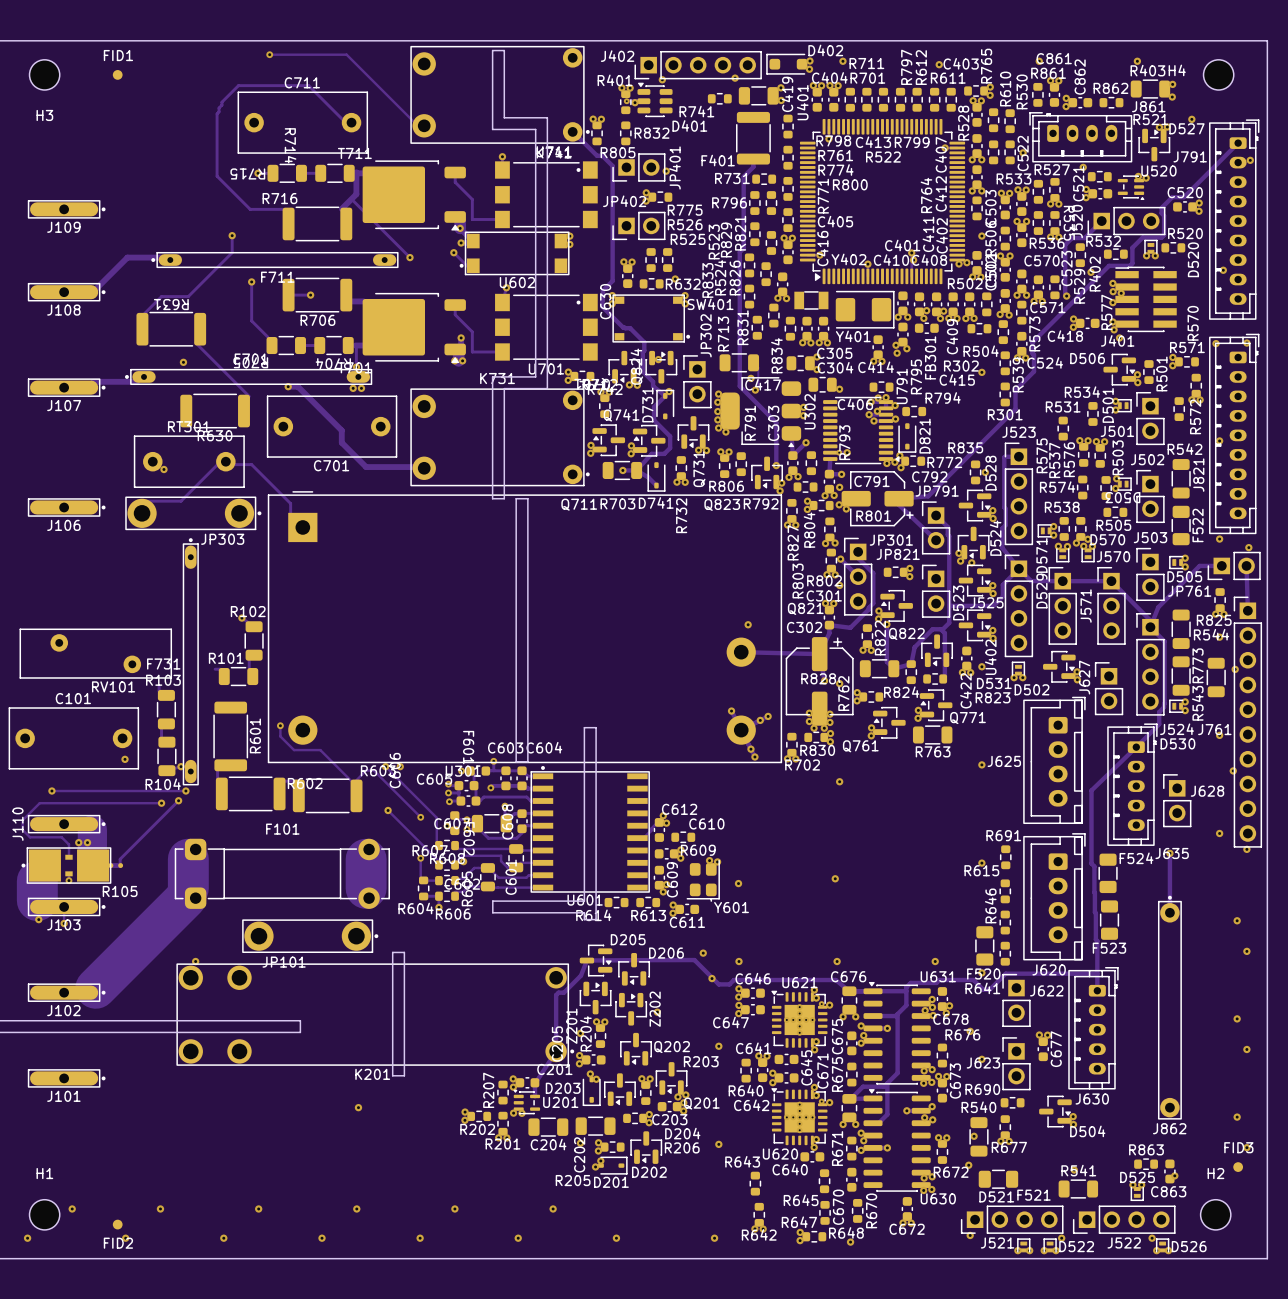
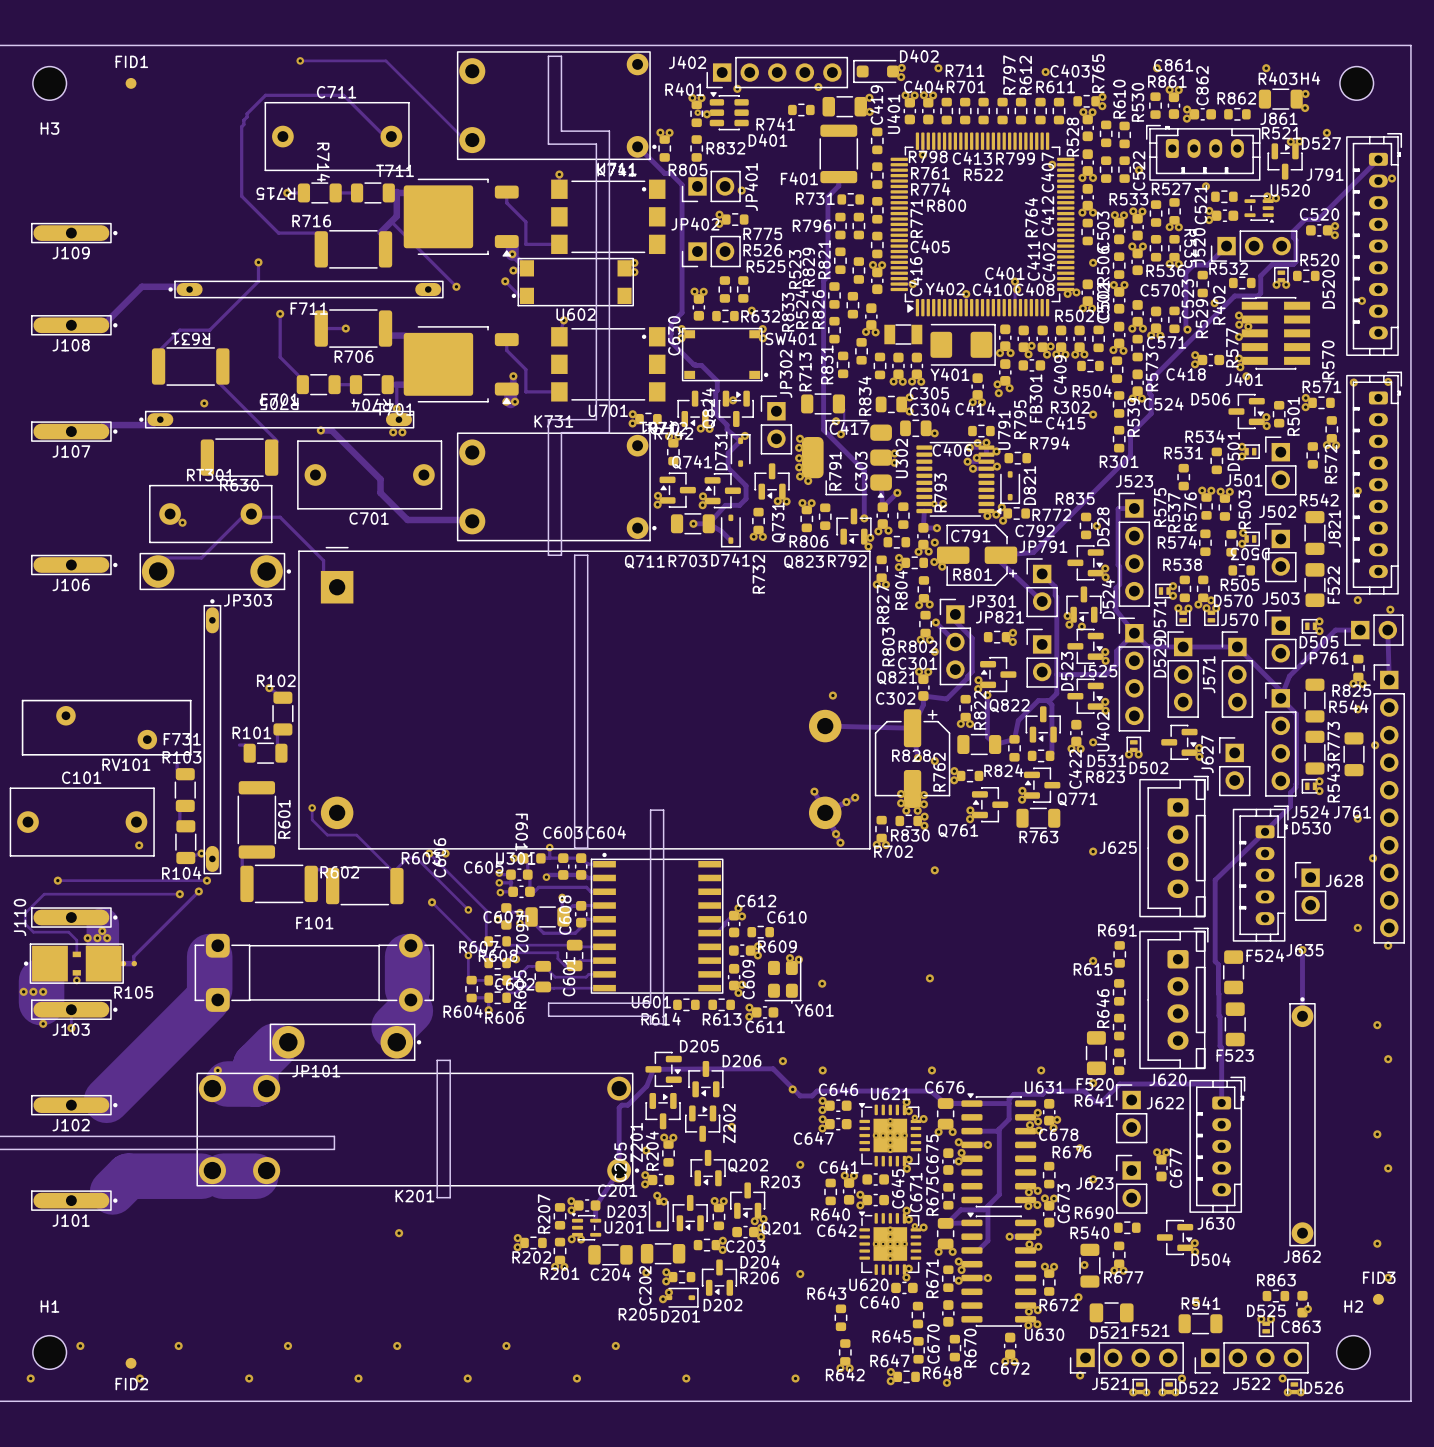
via: none -> (102, 931)
via: none -> (107, 938)
via: none -> (23, 991)
via: none -> (33, 991)
via: none -> (43, 991)
track: none -> (410, 1010) (394, 1027)
track: none -> (274, 1046) (255, 1065) (255, 1084) (227, 1084)
track: none -> (201, 1176) (128, 1176) (112, 1191)
track: none -> (223, 1176) (255, 1176)

